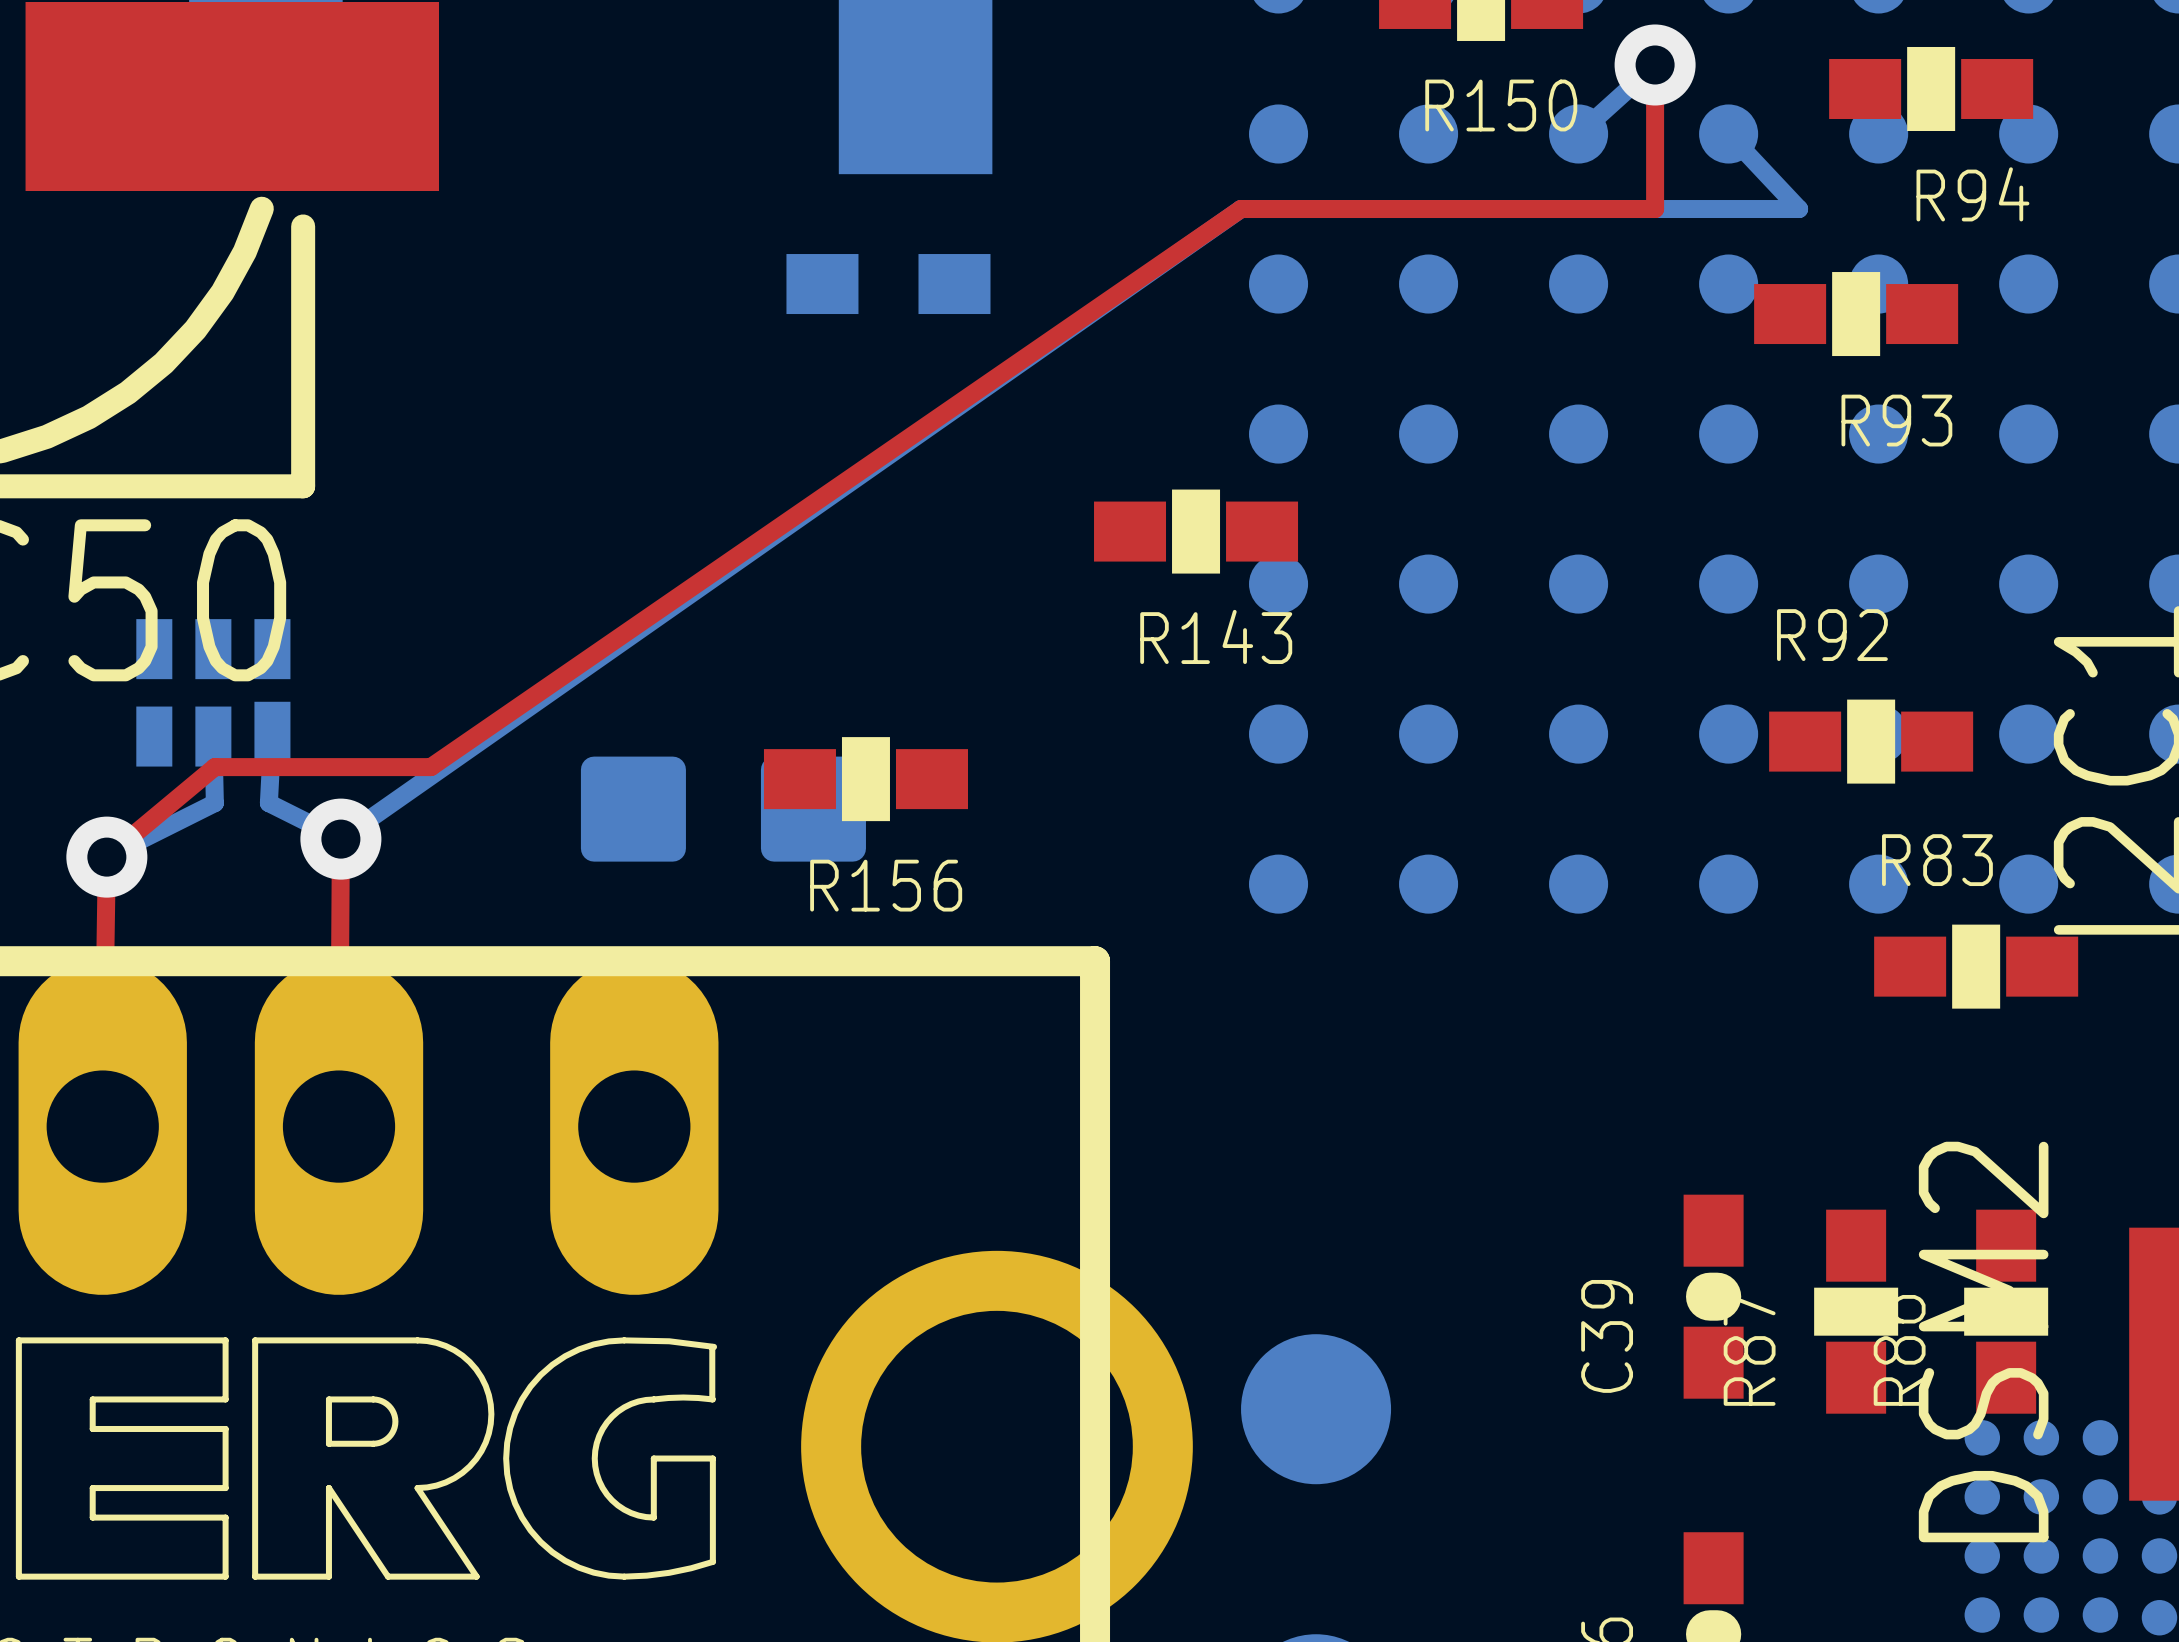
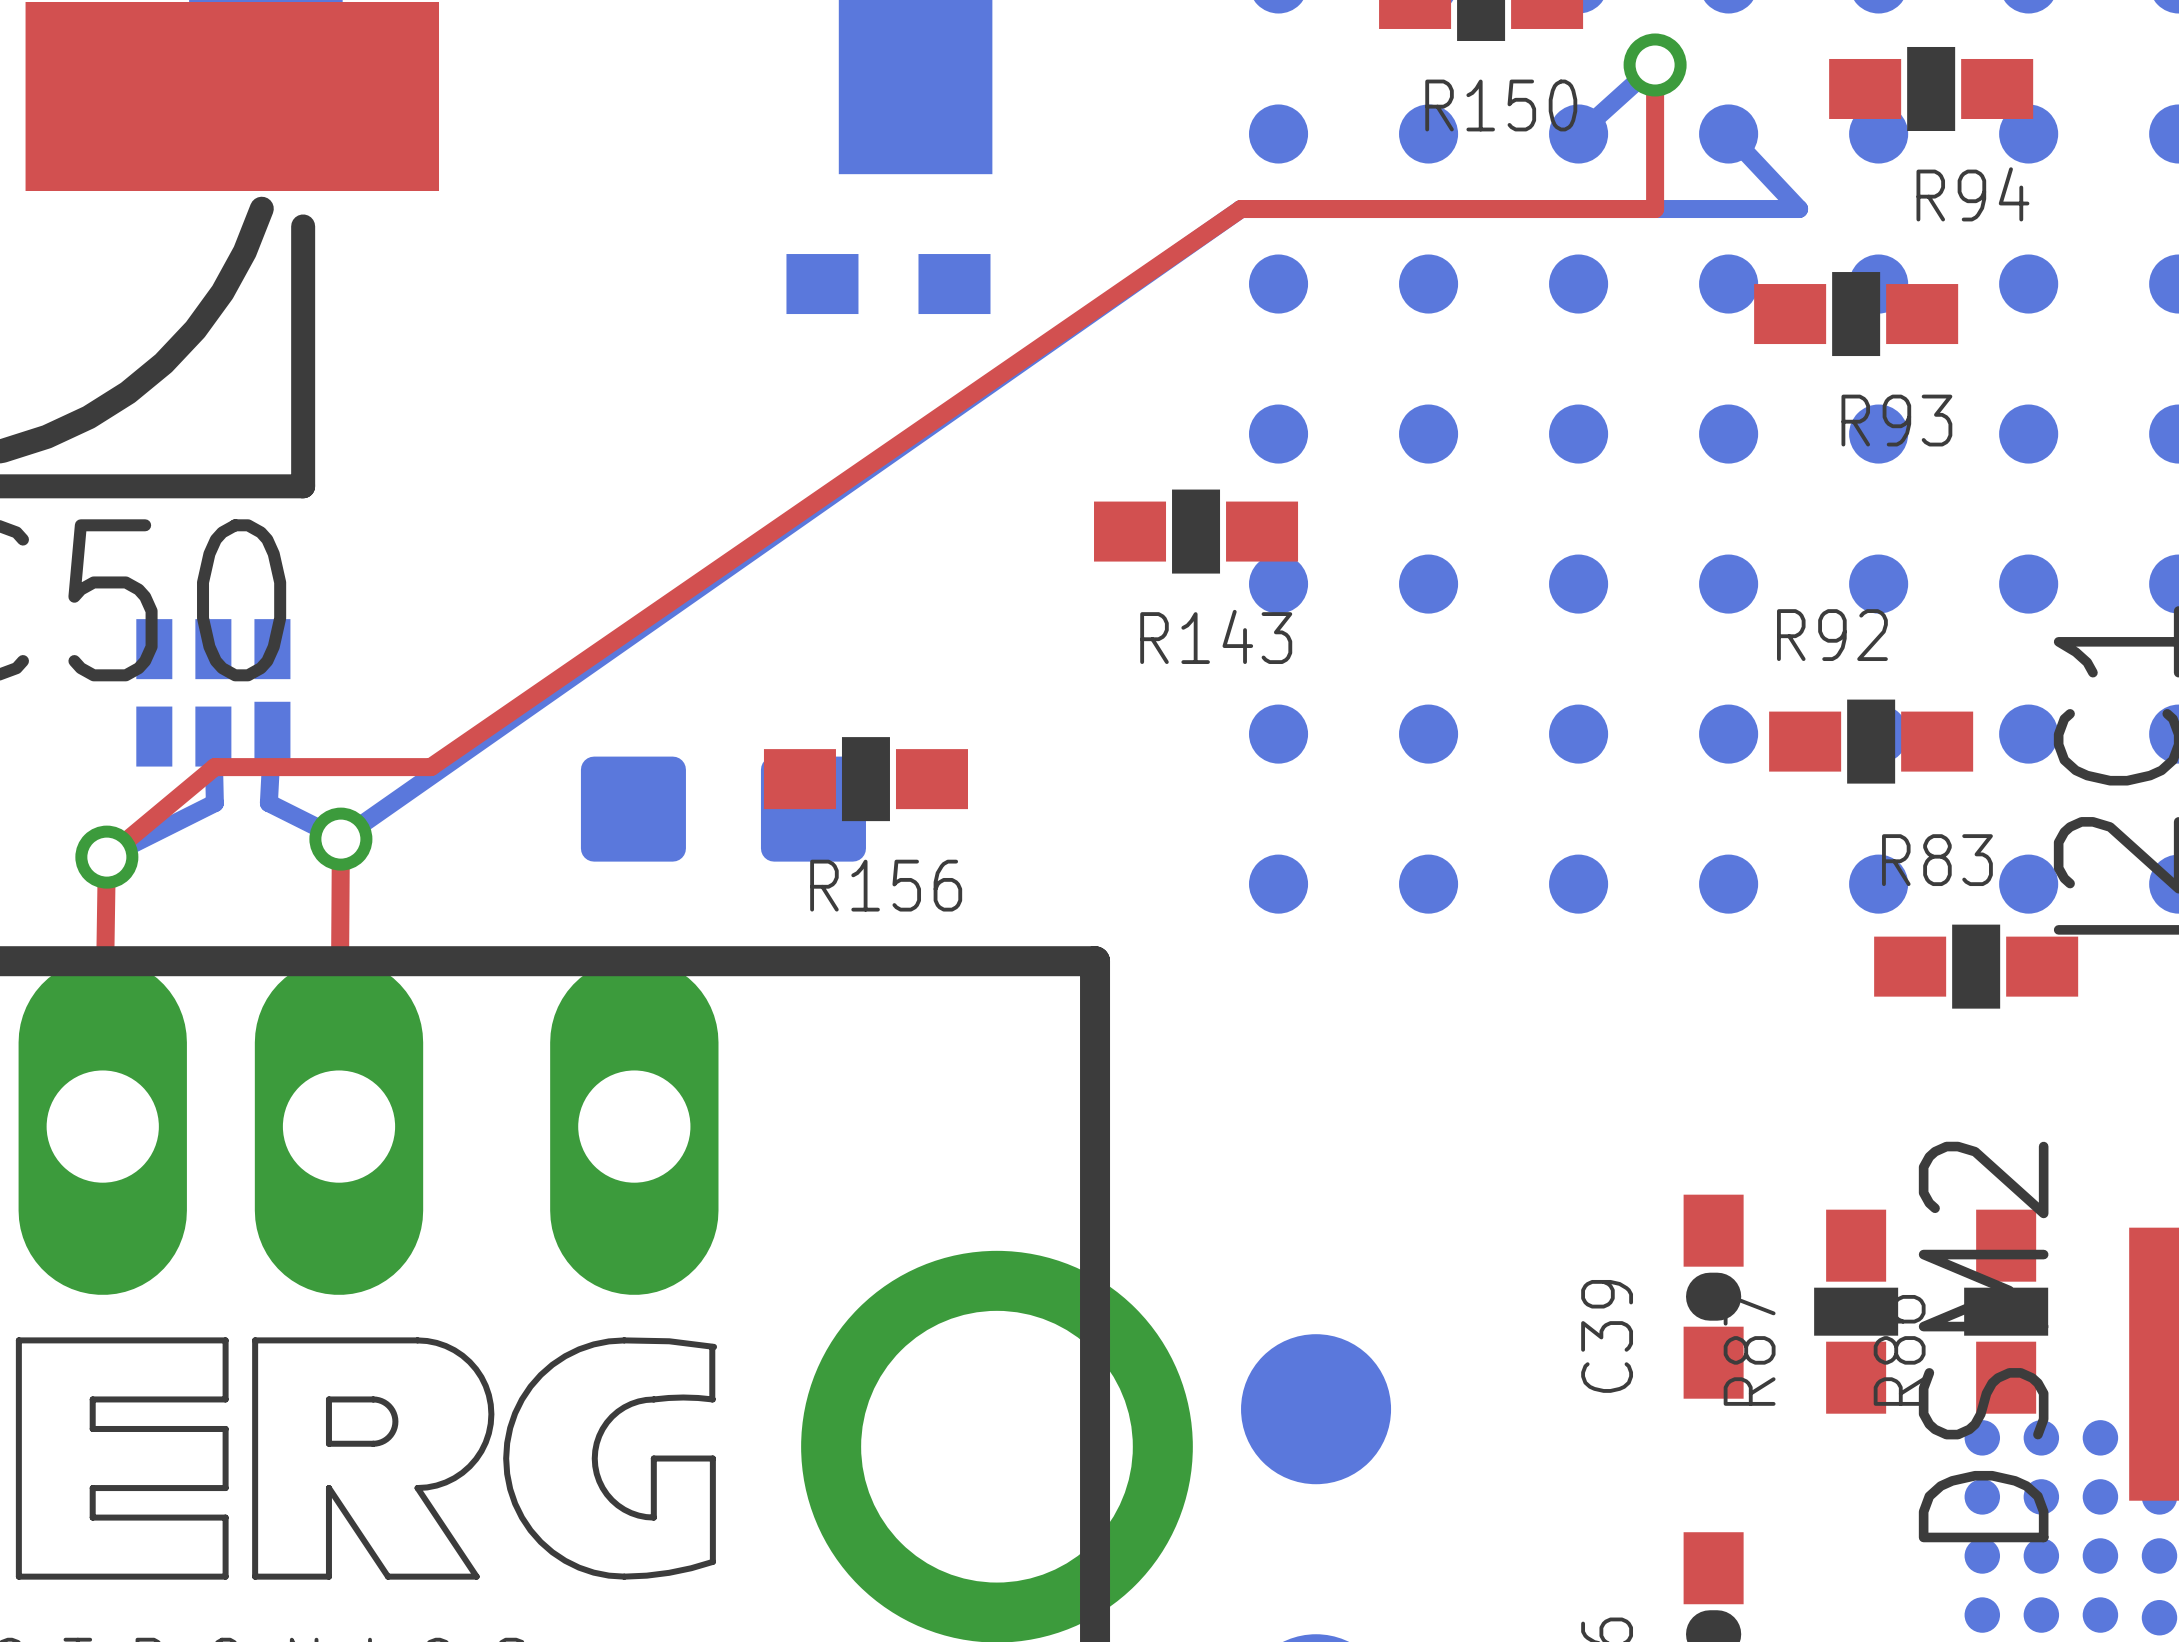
via size: [1614, 24, 1696, 106] -> [1623, 33, 1687, 97]
via size: [300, 798, 382, 880] -> [309, 807, 373, 871]
via size: [66, 816, 148, 898] -> [75, 825, 139, 889]

